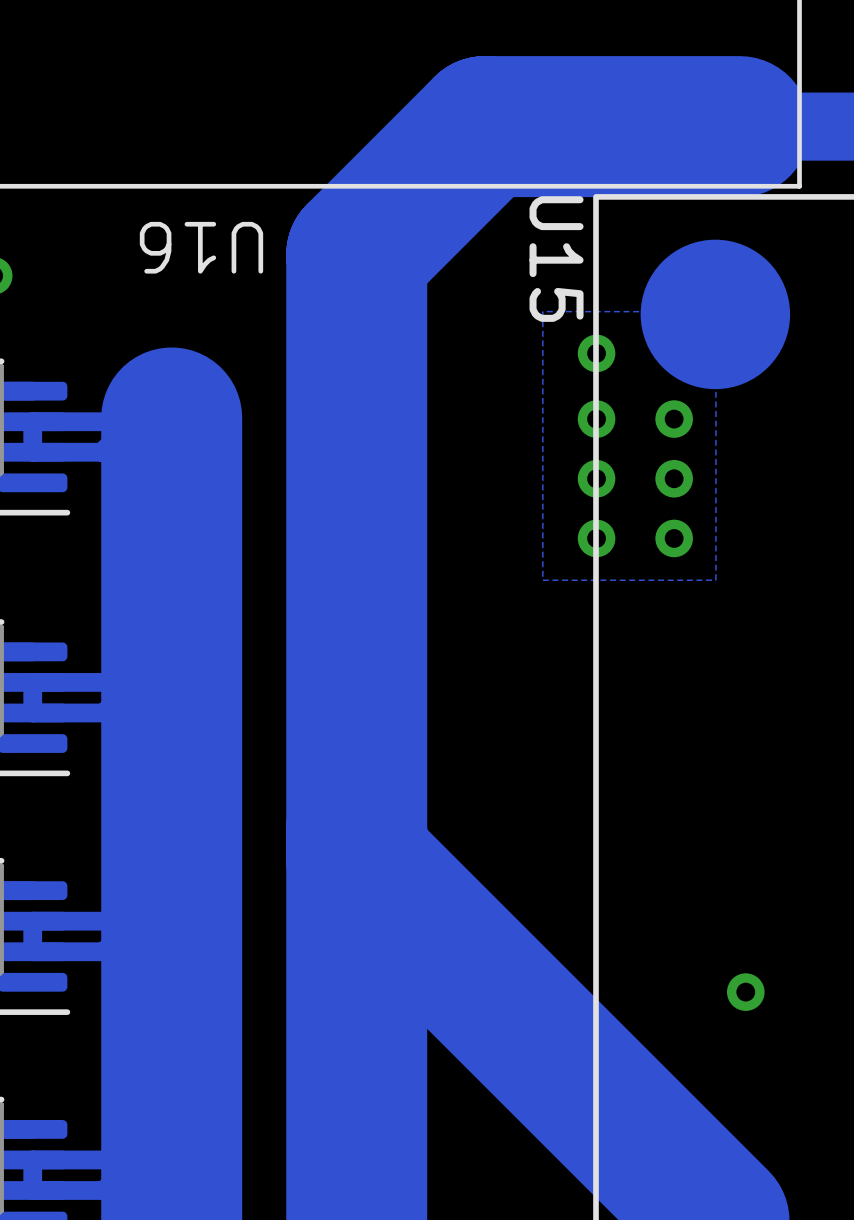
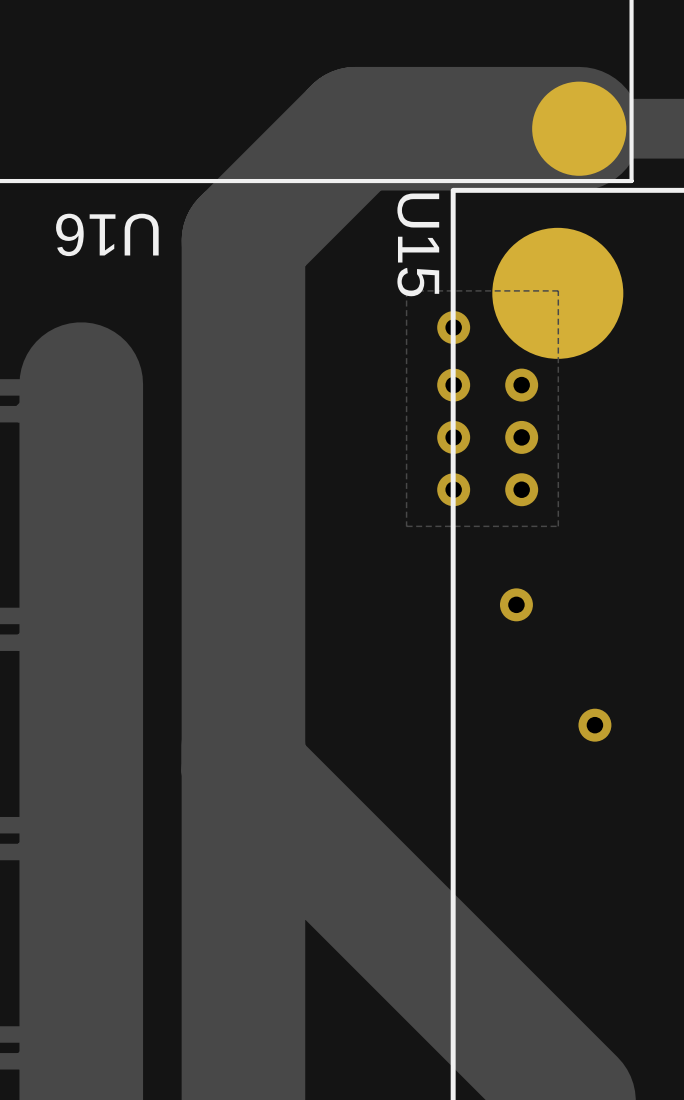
via: none -> (516, 604)
via: none -> (594, 725)
via: (745, 992) -> none

